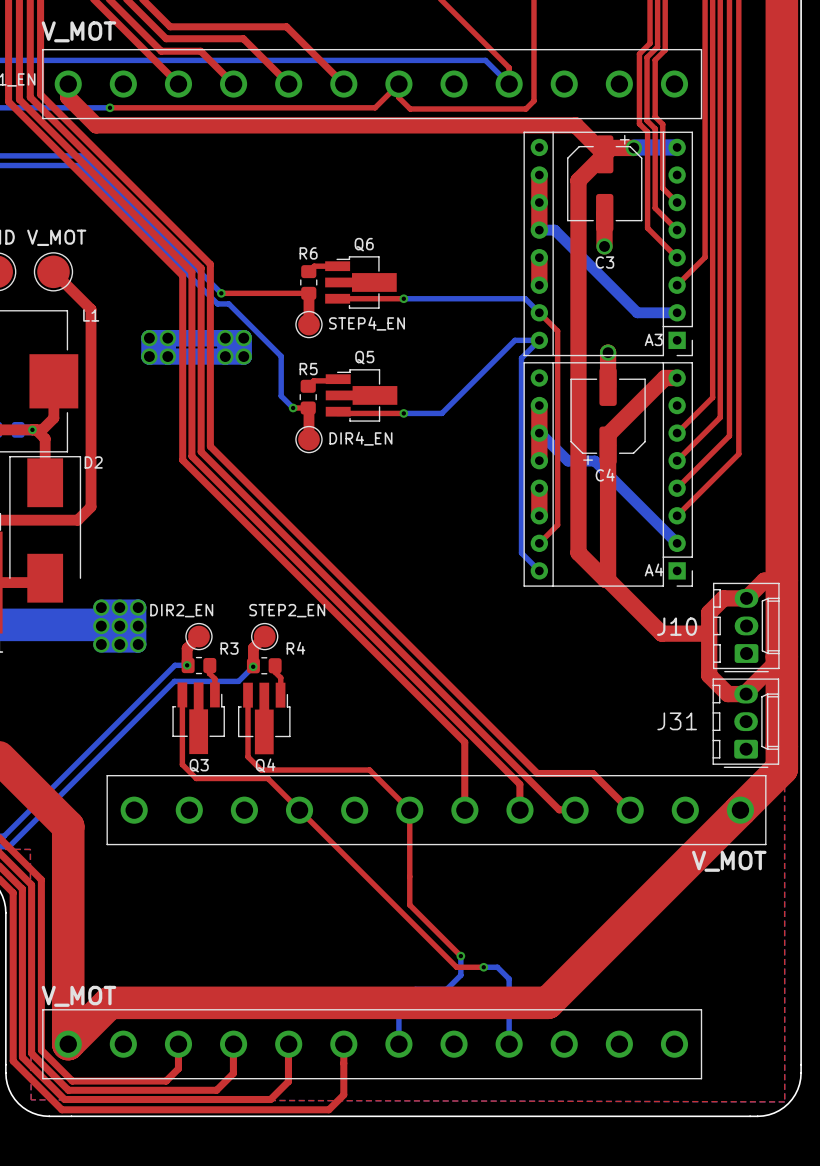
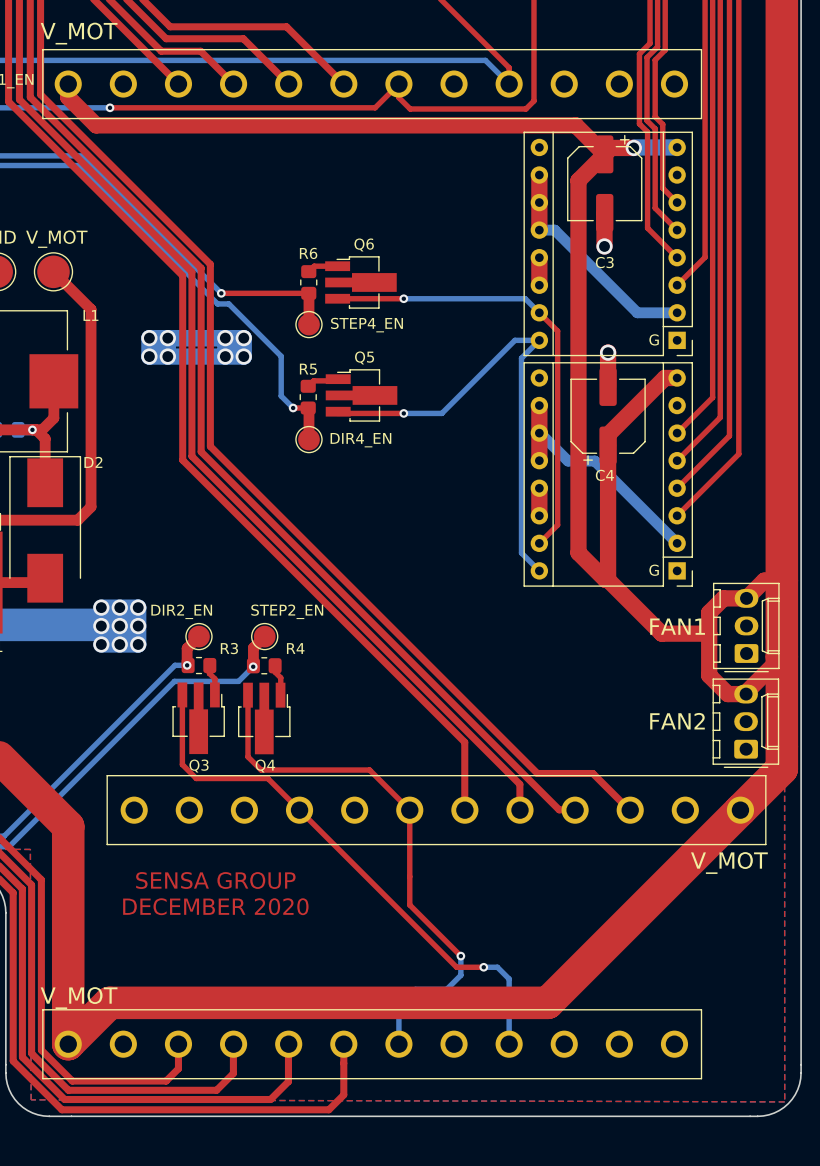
A3 name: A3 (653, 339) -> G (654, 339)
A4 name: A4 (654, 569) -> G (654, 570)
J10 name: J10 (677, 626) -> FAN1 (677, 626)
J31 name: J31 (677, 721) -> FAN2 (677, 721)
text: none -> SENSA GROUP (215, 880)
text: none -> DECEMBER 2020 (215, 906)

